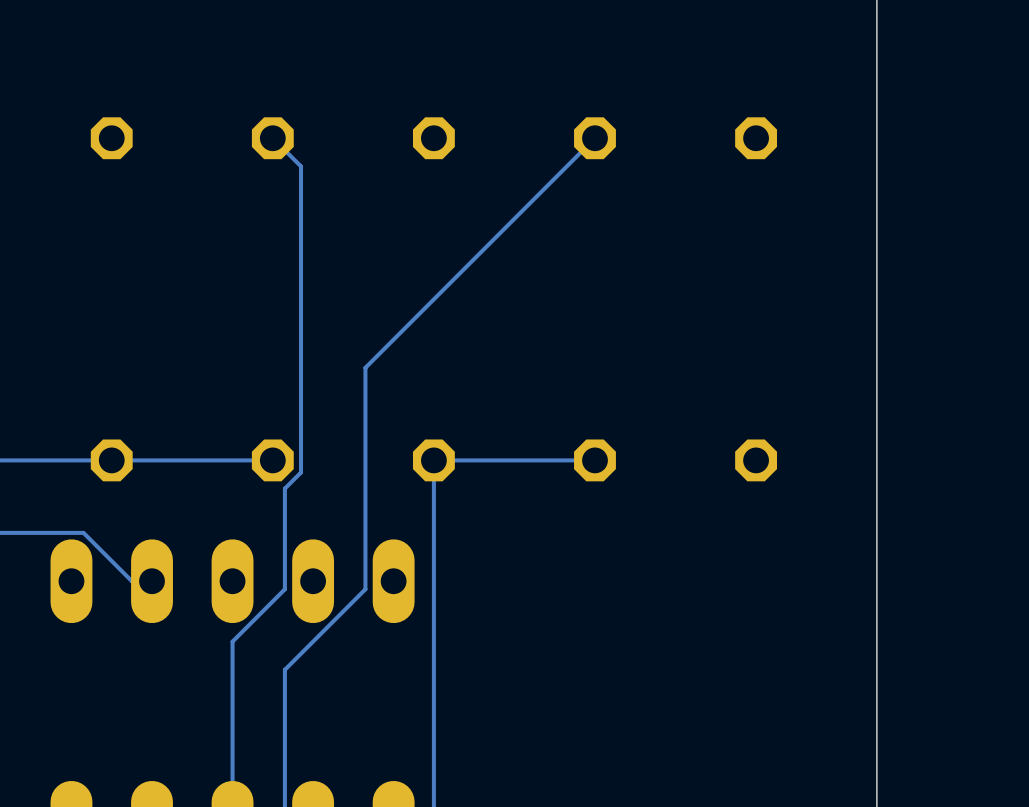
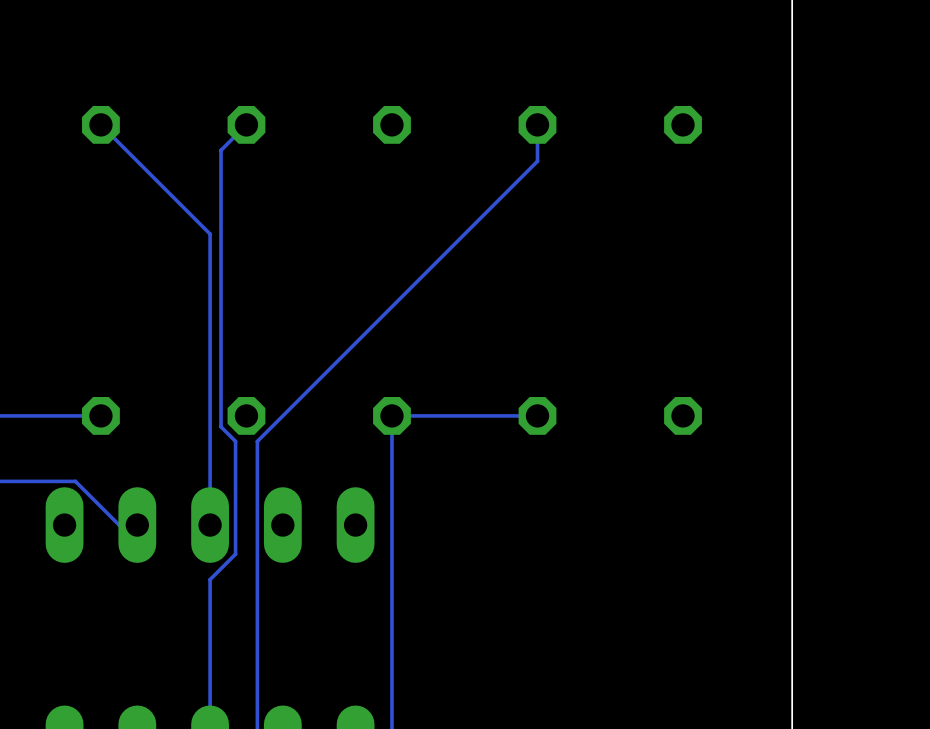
track: none -> (100, 124) (210, 234) (210, 525)
track: (272, 138) (301, 166) (301, 472) -> (246, 124) (221, 150) (221, 426) (235, 441) (235, 554)
track: (594, 138) (365, 367) (365, 589) (284, 669) -> (537, 124) (537, 161) (271, 426)
track: (272, 460) (111, 460) -> none
track: (284, 589) (260, 613) -> (257, 532) (257, 605)

